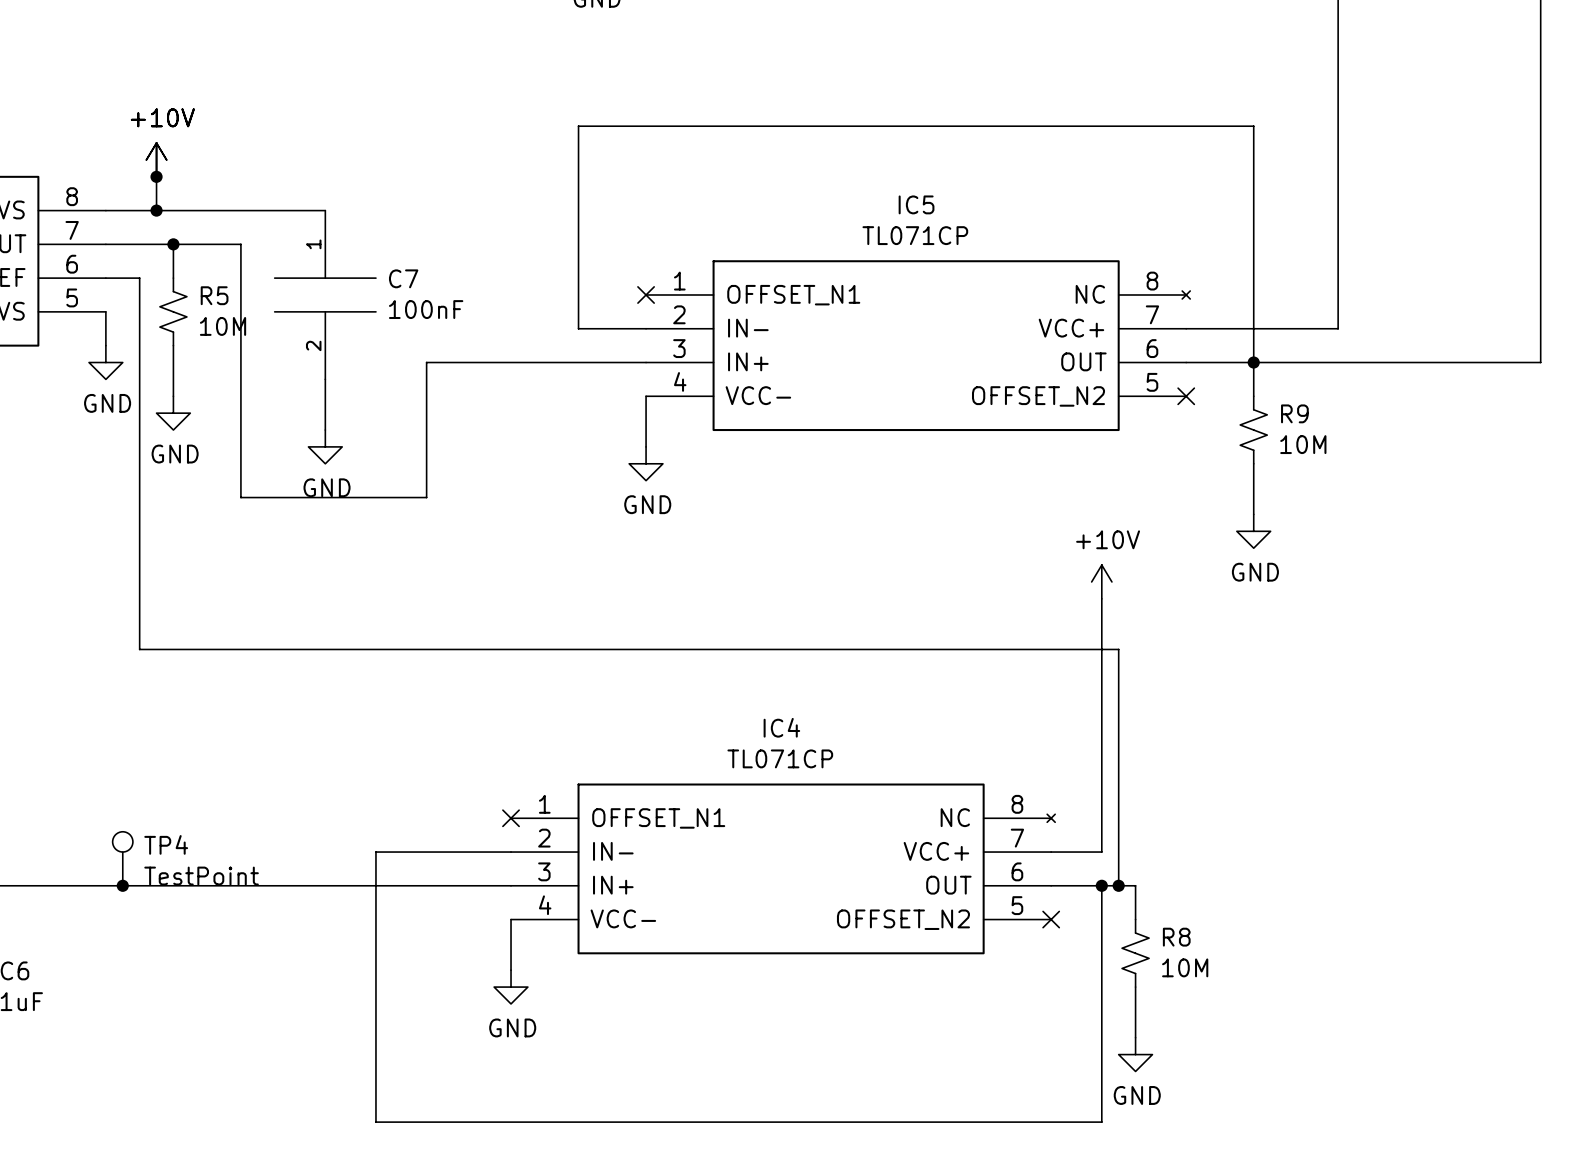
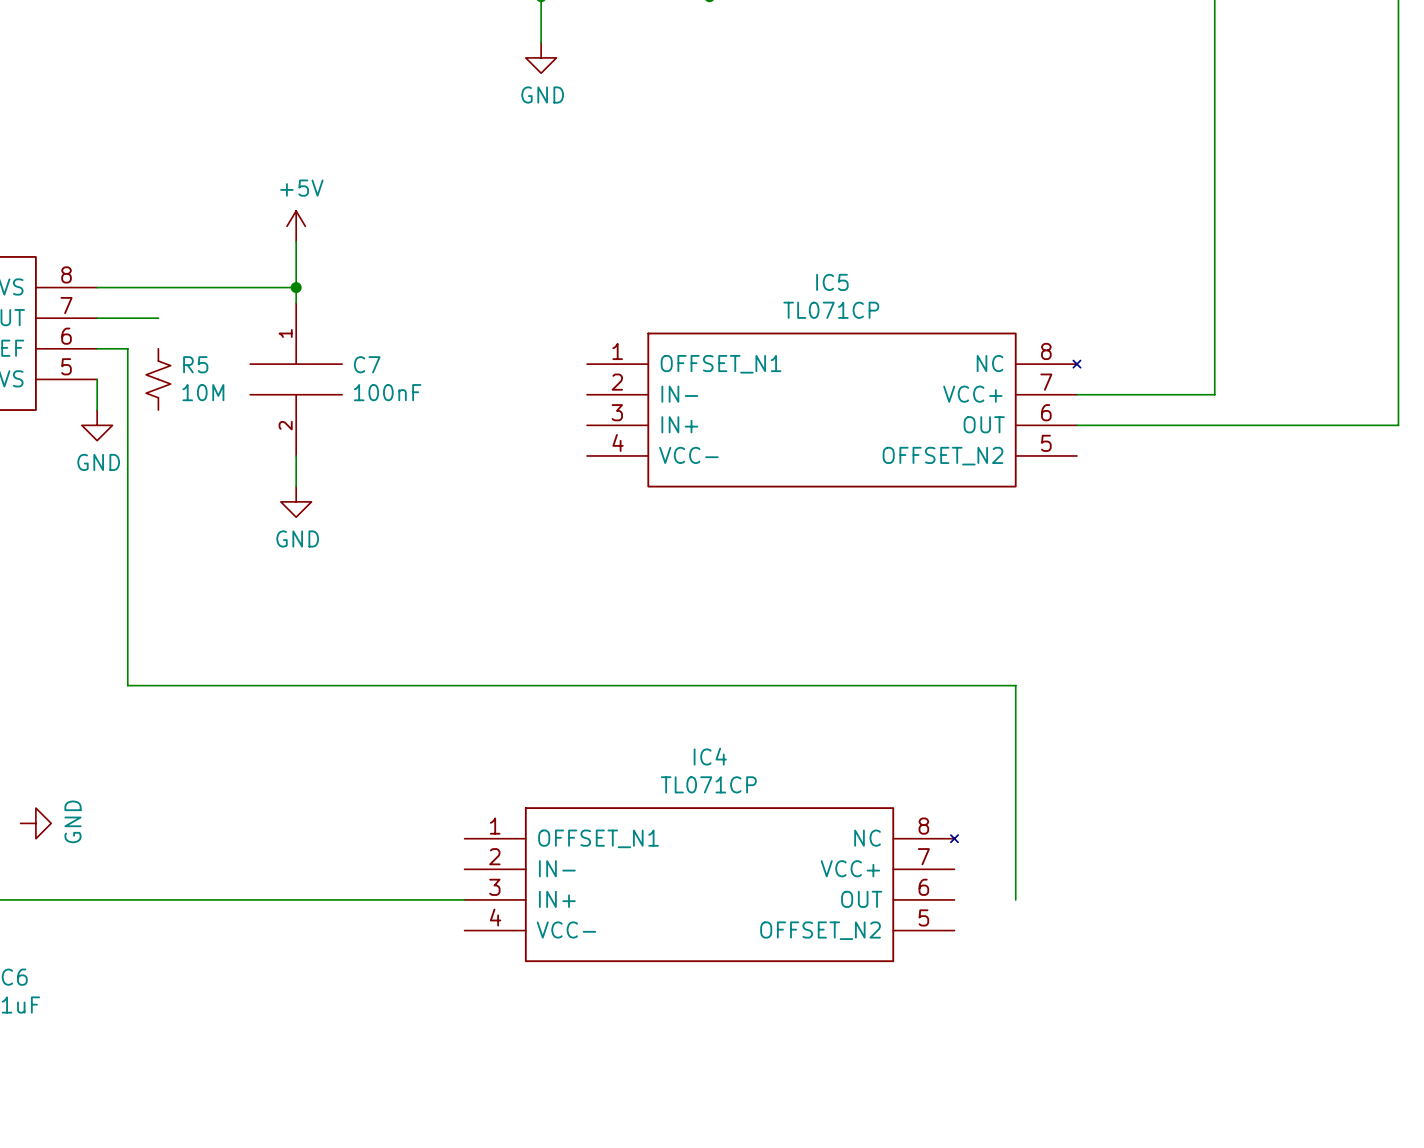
power symbol: none -> +5V (296, 226)
power symbol: +10V (156, 159) -> none
wire: none -> (296, 241) (296, 302)
wire: (156, 176) (156, 210) -> none
junction: (156, 176) -> none
junction: (156, 210) -> none
junction: none -> (296, 287)
junction: (173, 244) -> none
wire: (173, 278) (173, 244) (240, 244) (240, 497) (426, 497) (426, 362) (646, 362) -> none
C7 position: (325, 294) -> (296, 379)
no-connect mark: (646, 294) -> none
wire: (646, 328) (578, 328) (578, 126) (1253, 126) (1253, 396) -> none
wire: (173, 345) (173, 396) -> none
junction: (1253, 362) -> none
wire: (646, 396) (646, 446) -> none
no-connect mark: (1186, 396) -> none
power symbol: GND (173, 413) -> none
R9: 10M (1253, 430) -> none
power symbol: GND (646, 463) -> none
wire: (1253, 463) (1253, 514) -> none
power symbol: GND (1253, 531) -> none
power symbol: +10V (1101, 581) -> none
wire: (1101, 598) (1101, 852) (1051, 852) -> none
power symbol: none -> GND (35, 823)
no-connect mark: (511, 818) -> none
wire: (511, 852) (375, 852) (375, 1122) (1101, 1122) (1101, 885) -> none
TP4: TestPoint (122, 858) -> none
junction: (122, 885) -> none
wire: (1051, 885) (1135, 885) (1135, 919) -> none
junction: (1101, 885) -> none
junction: (1118, 885) -> none
wire: (511, 919) (511, 970) -> none
no-connect mark: (1051, 919) -> none
R8: 10M (1135, 953) -> none
power symbol: GND (511, 987) -> none
wire: (1135, 987) (1135, 1037) -> none
power symbol: GND (1135, 1054) -> none

